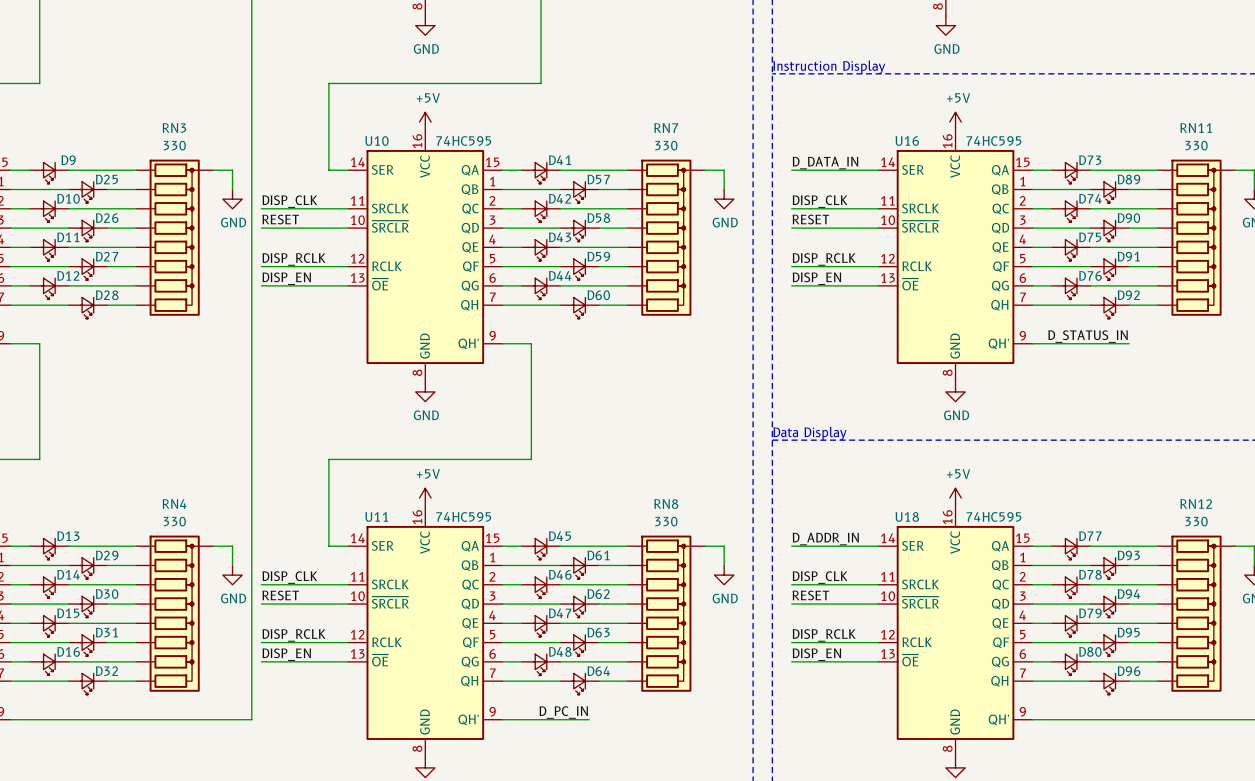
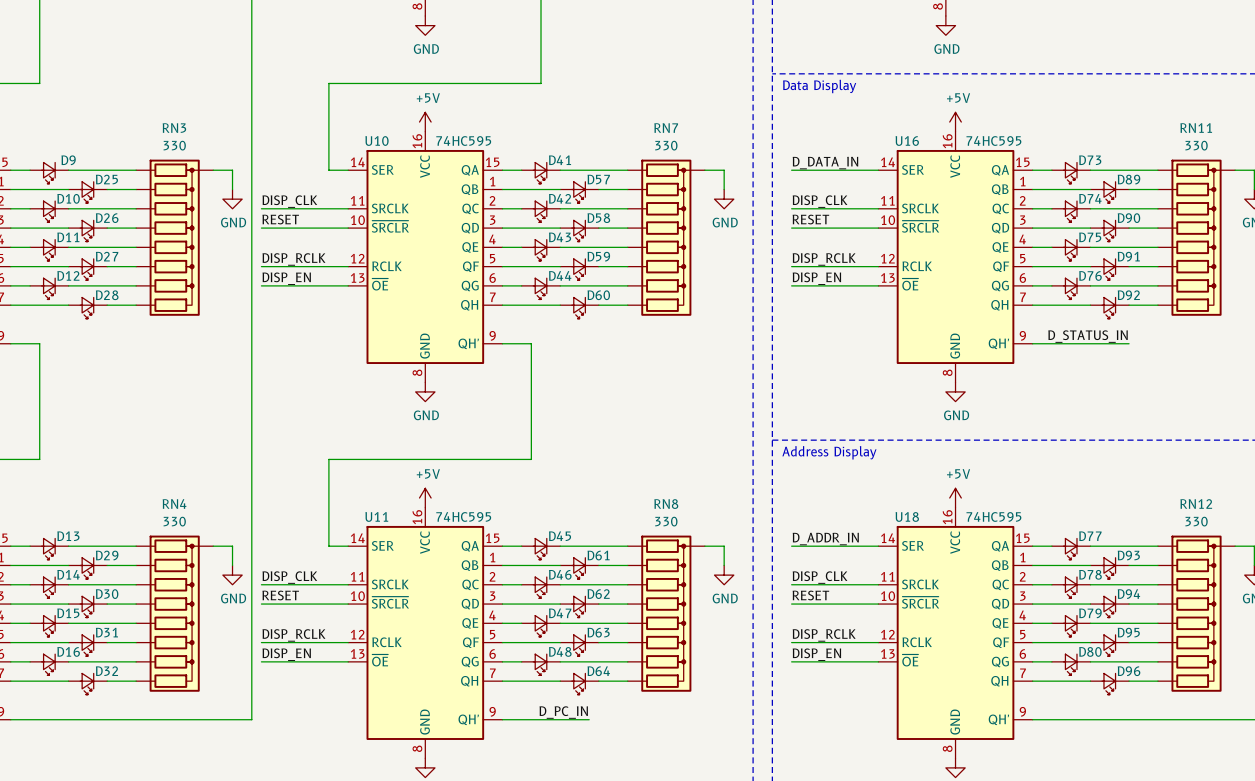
text: Instruction Display (829, 67) -> none
text: none -> Data Display (819, 86)
text: Data Display (810, 433) -> none
text: none -> Address Display (829, 452)

